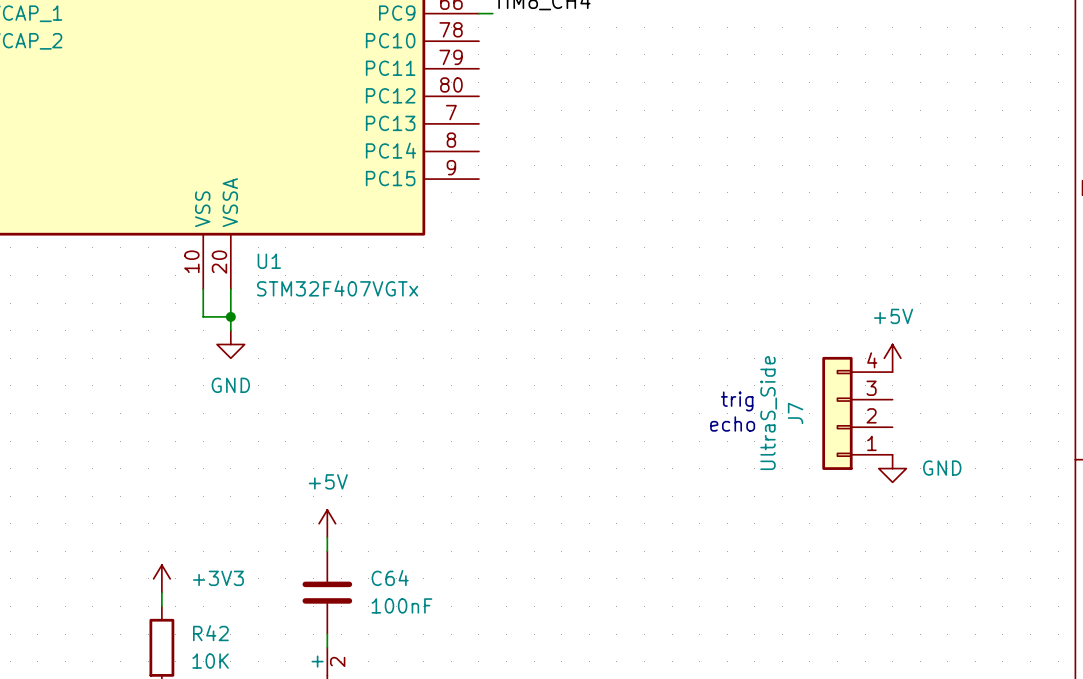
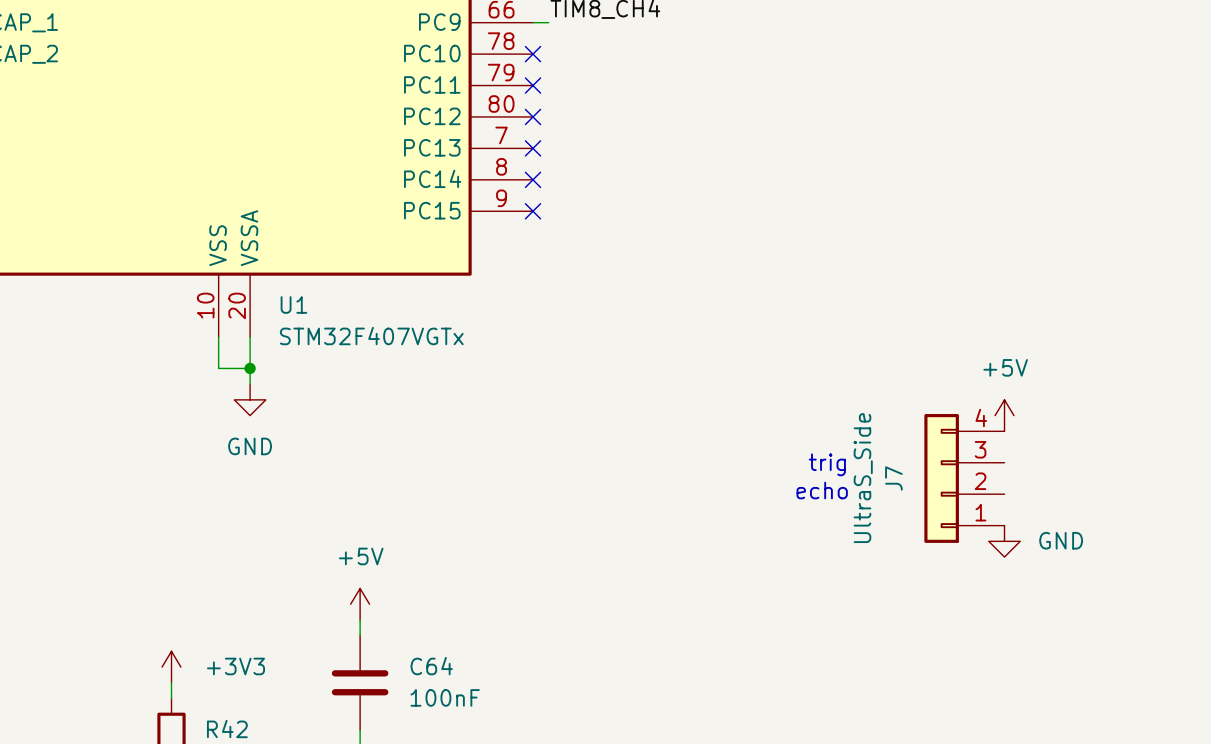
no-connect mark: none -> (532, 54)
no-connect mark: none -> (532, 85)
no-connect mark: none -> (532, 116)
no-connect mark: none -> (532, 148)
no-connect mark: none -> (532, 179)
no-connect mark: none -> (532, 211)

